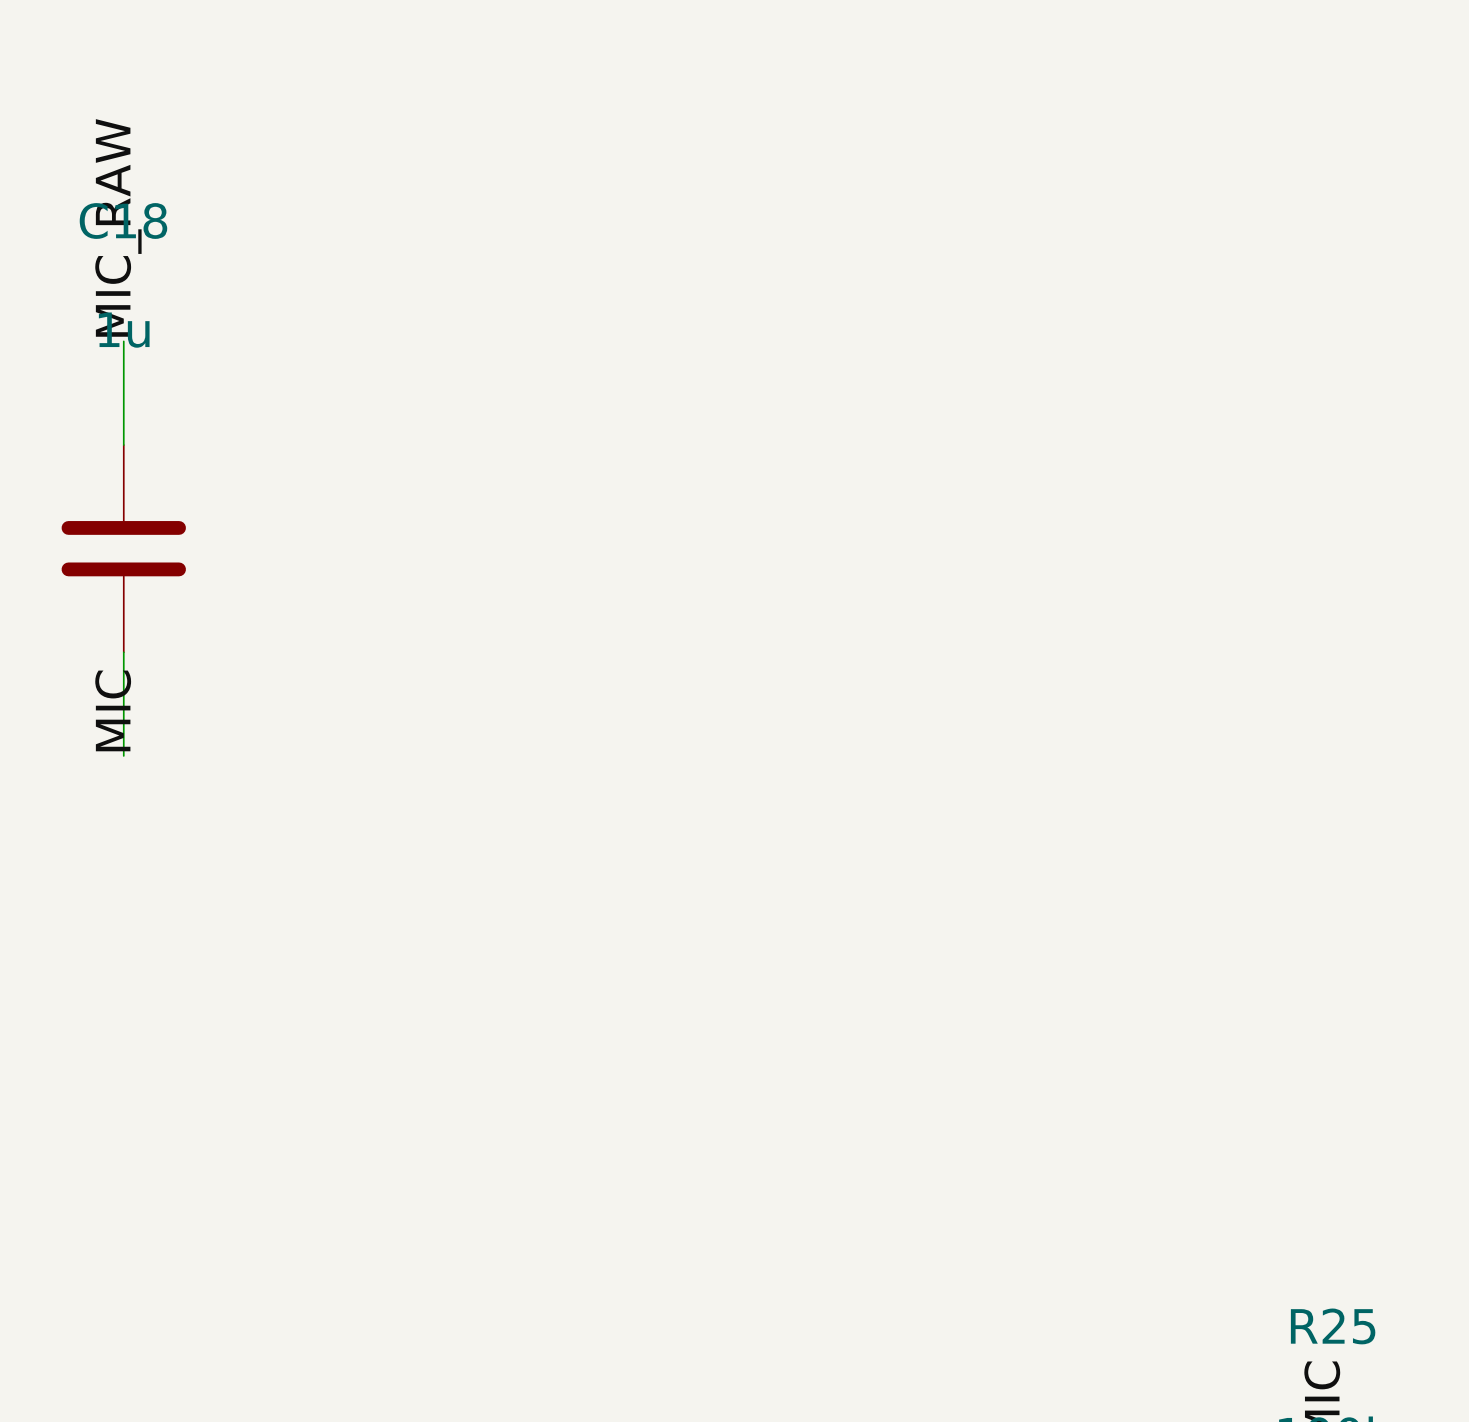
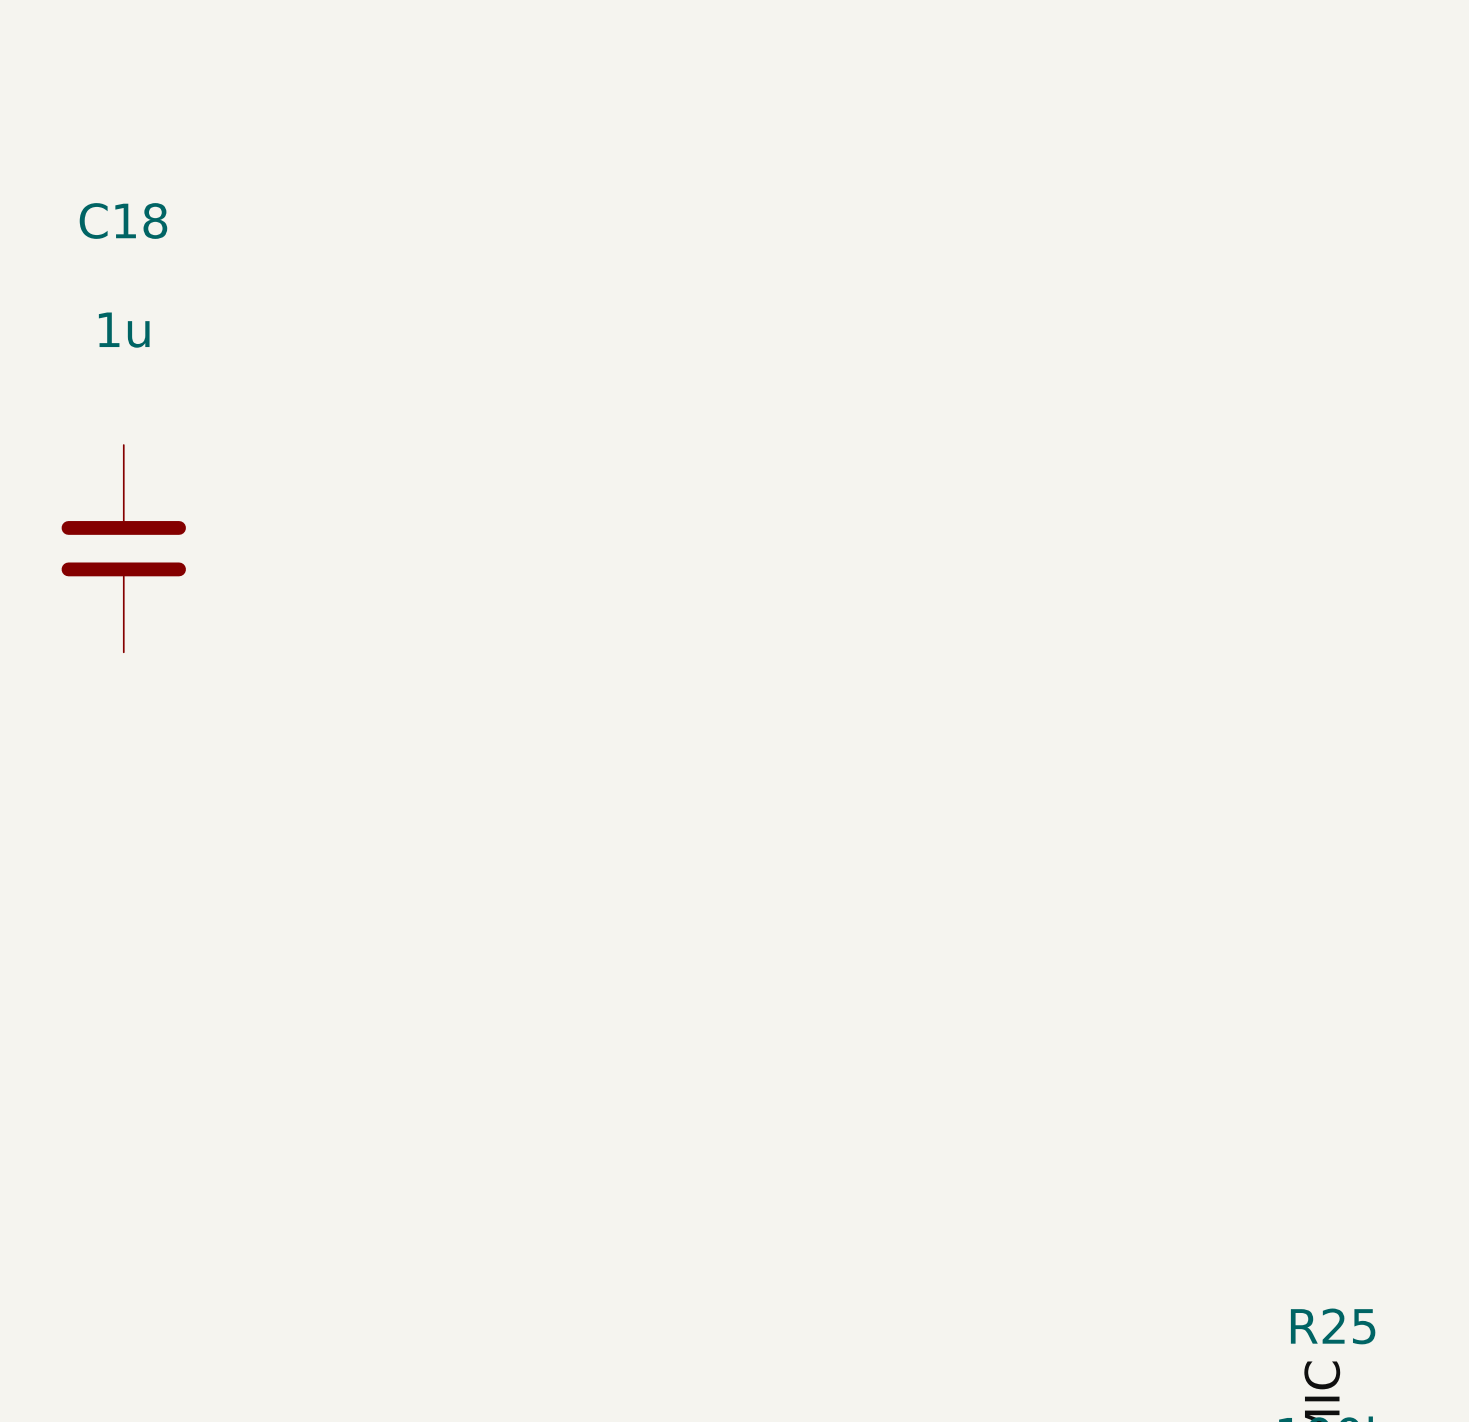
label: MIC_RAW (118, 227) -> none
wire: (123, 341) (123, 445) -> none
wire: (123, 652) (123, 755) -> none
label: MIC (113, 710) -> none

